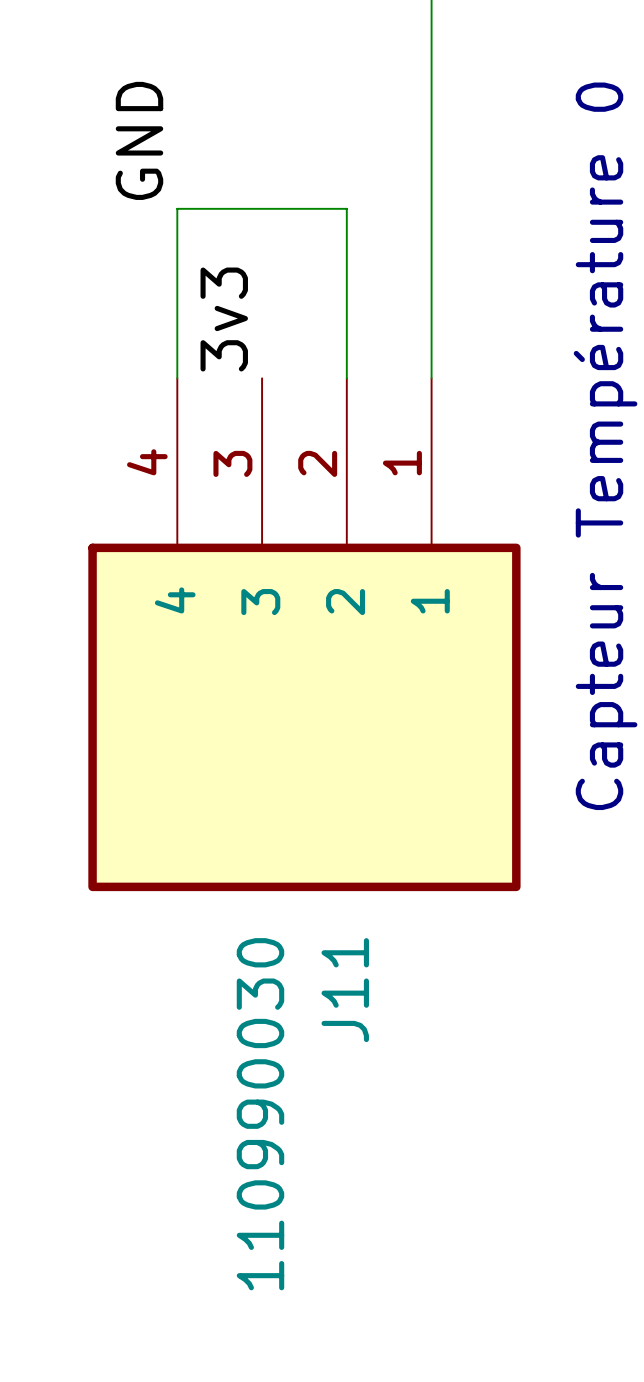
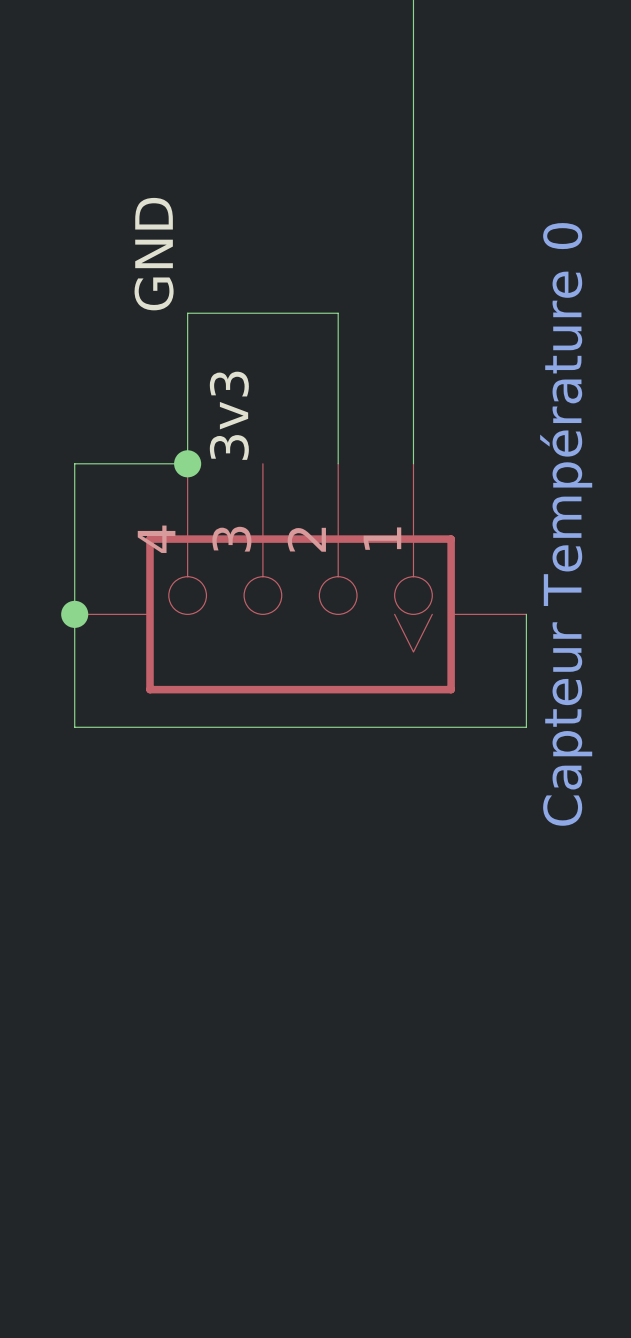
wire: none -> (187, 463) (74, 463) (74, 727) (526, 727) (526, 614)
junction: none -> (187, 463)
part: none -> (300, 578)
junction: none -> (74, 614)
J11: 110990030 (304, 634) -> none

